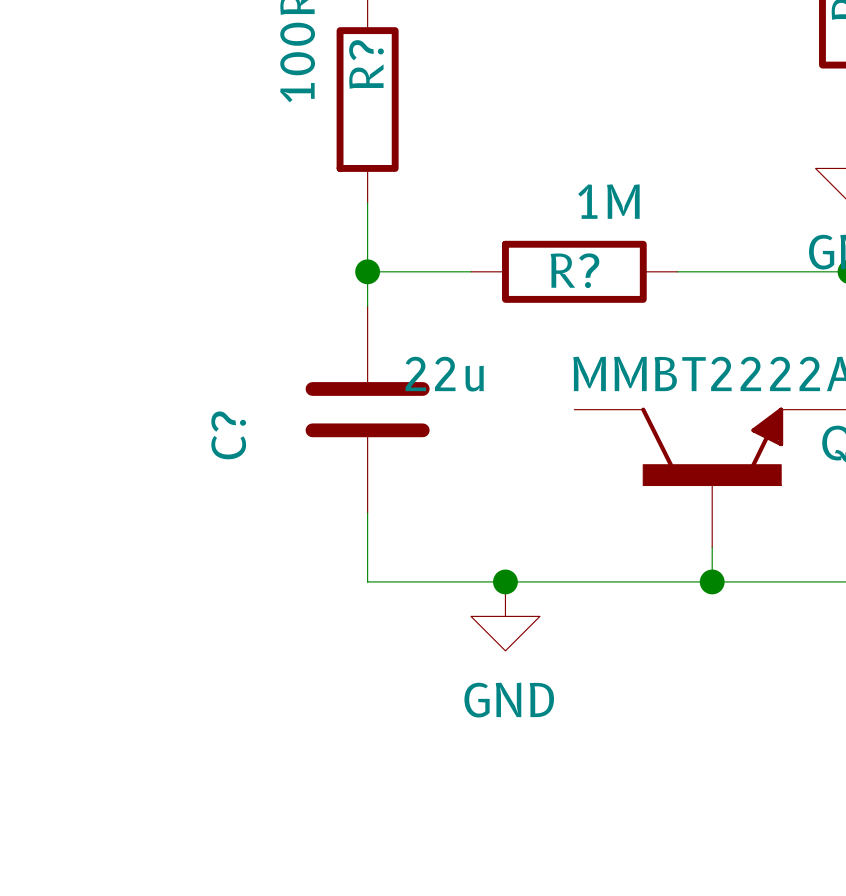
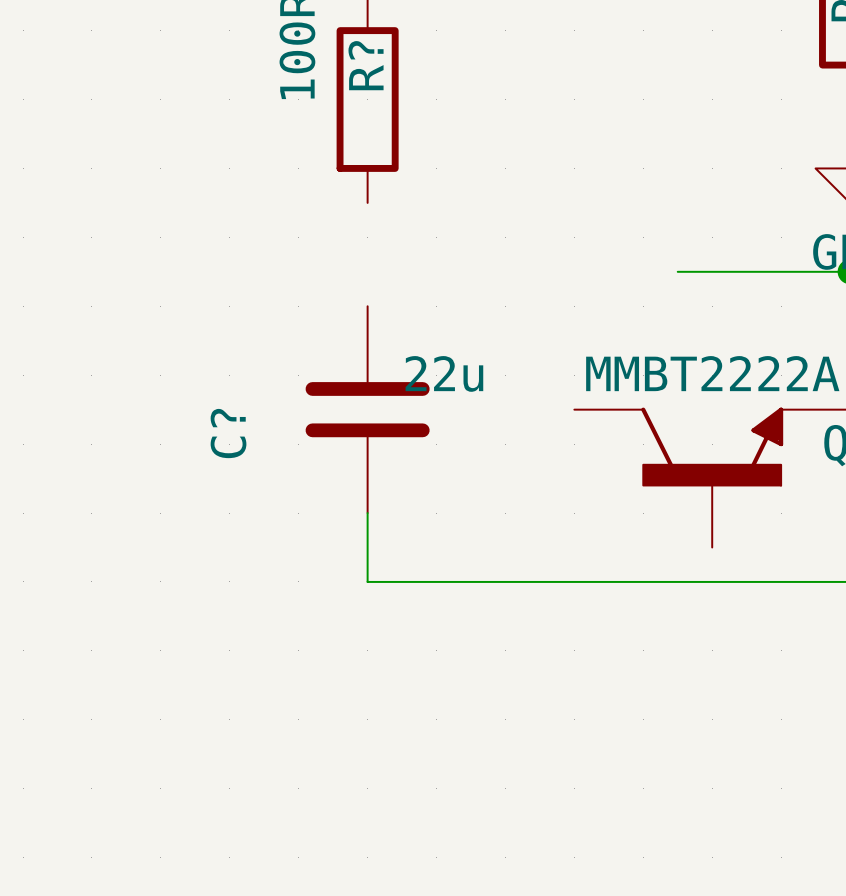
wire: (367, 202) (367, 306) -> none
wire: (367, 271) (470, 271) -> none
junction: (367, 271) -> none
R?: 1M (574, 271) -> none
wire: (712, 547) (712, 581) -> none
junction: (505, 581) -> none
junction: (712, 581) -> none
power symbol: GND (505, 616) -> none

